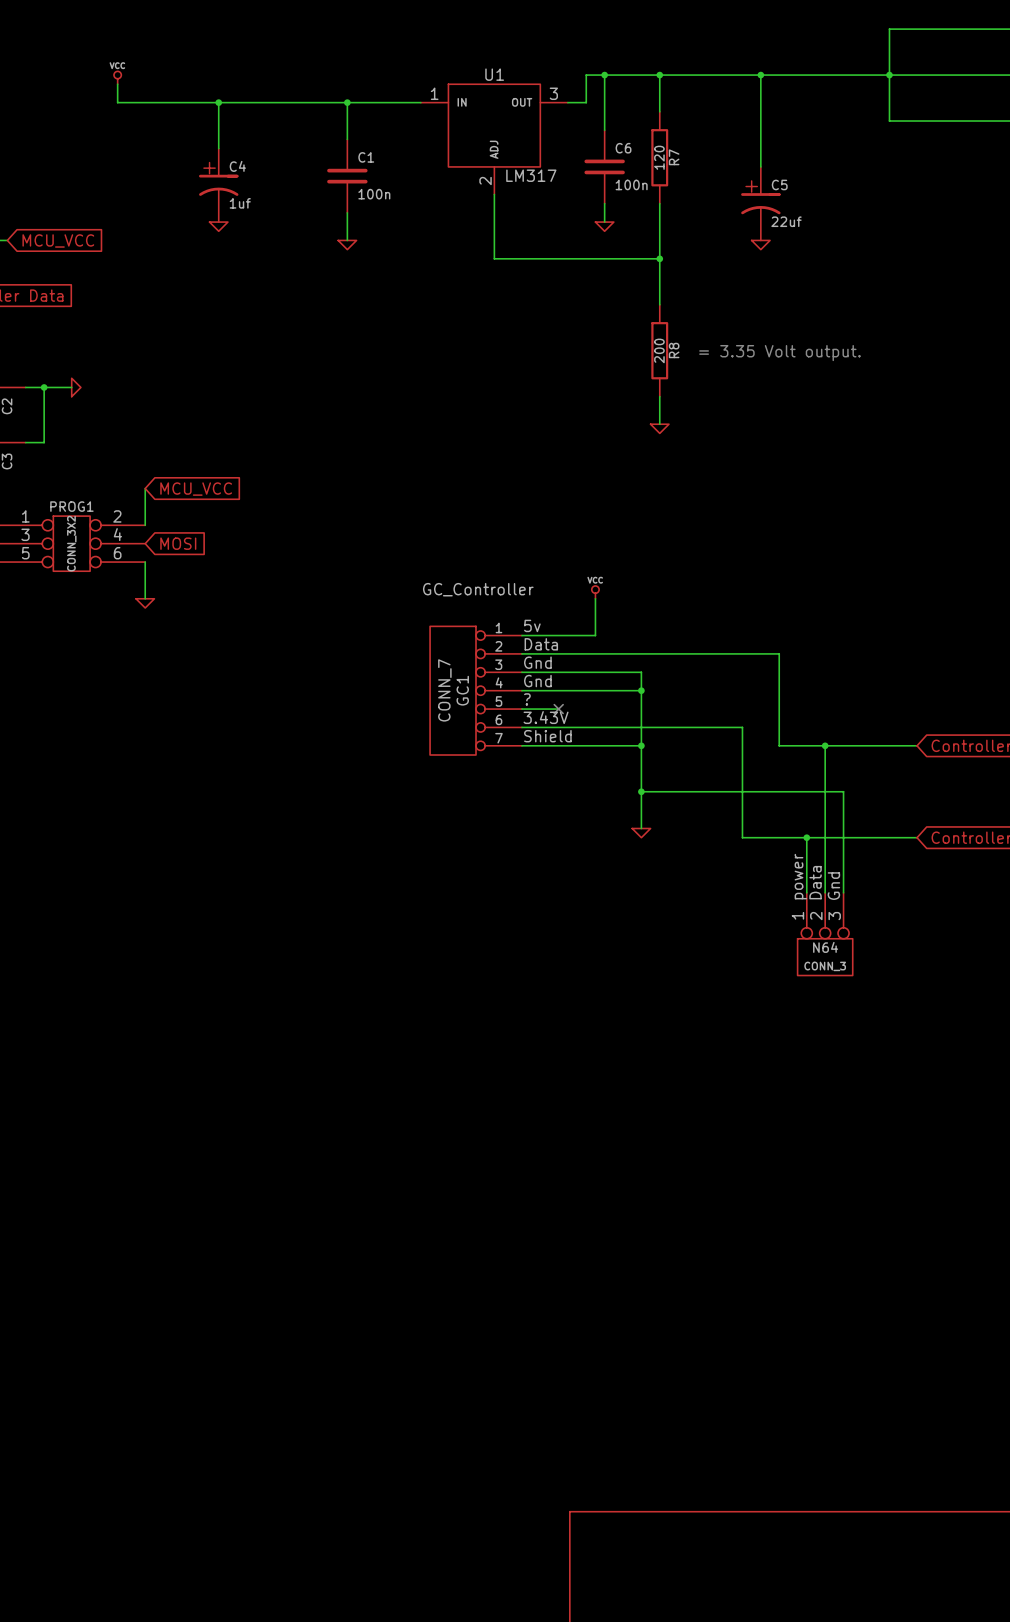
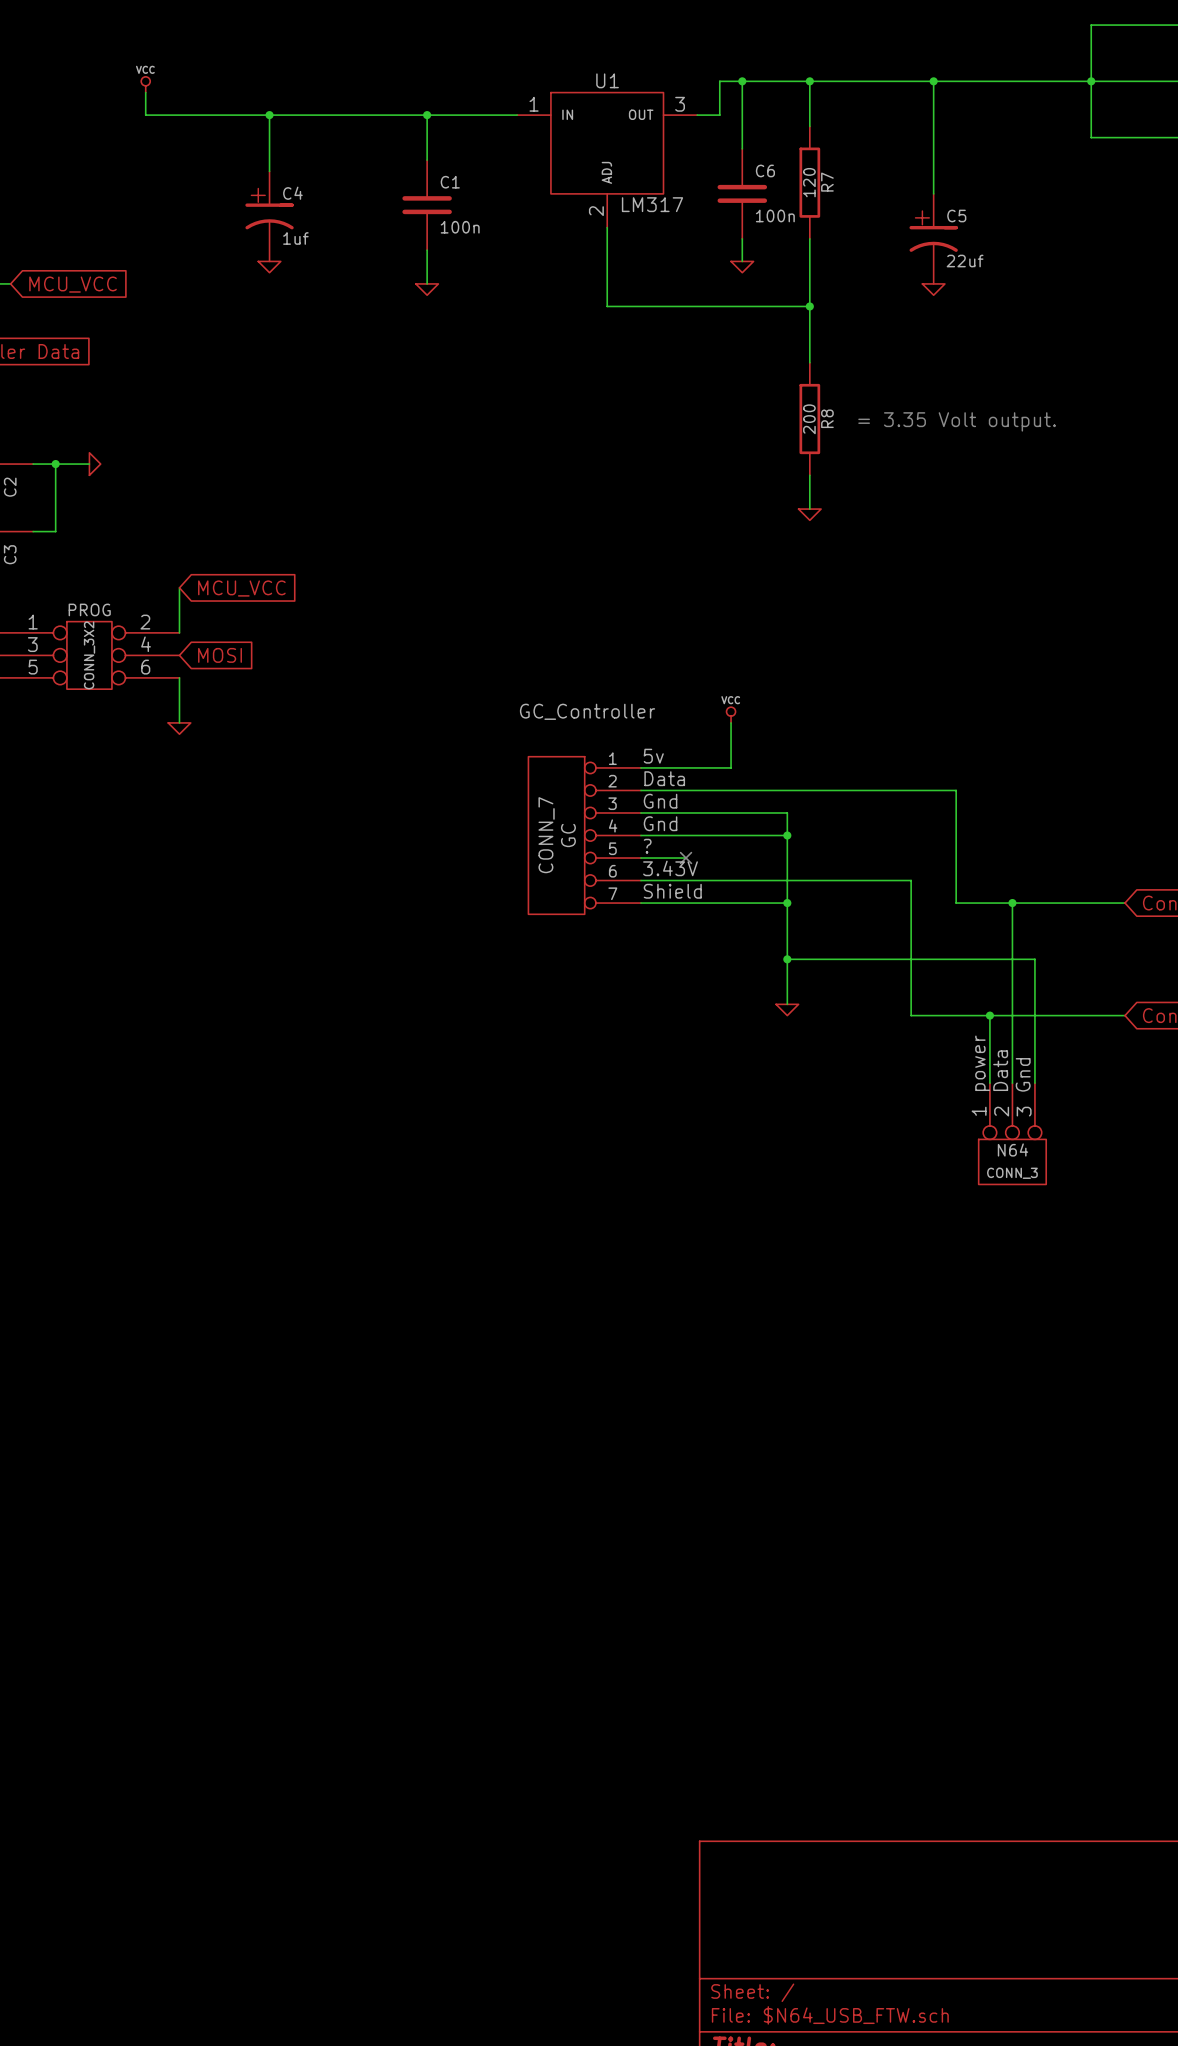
PROG1 name: PROG1 (71, 506) -> PROG (89, 609)
GC1 name: GC1 (462, 690) -> GC (568, 835)

